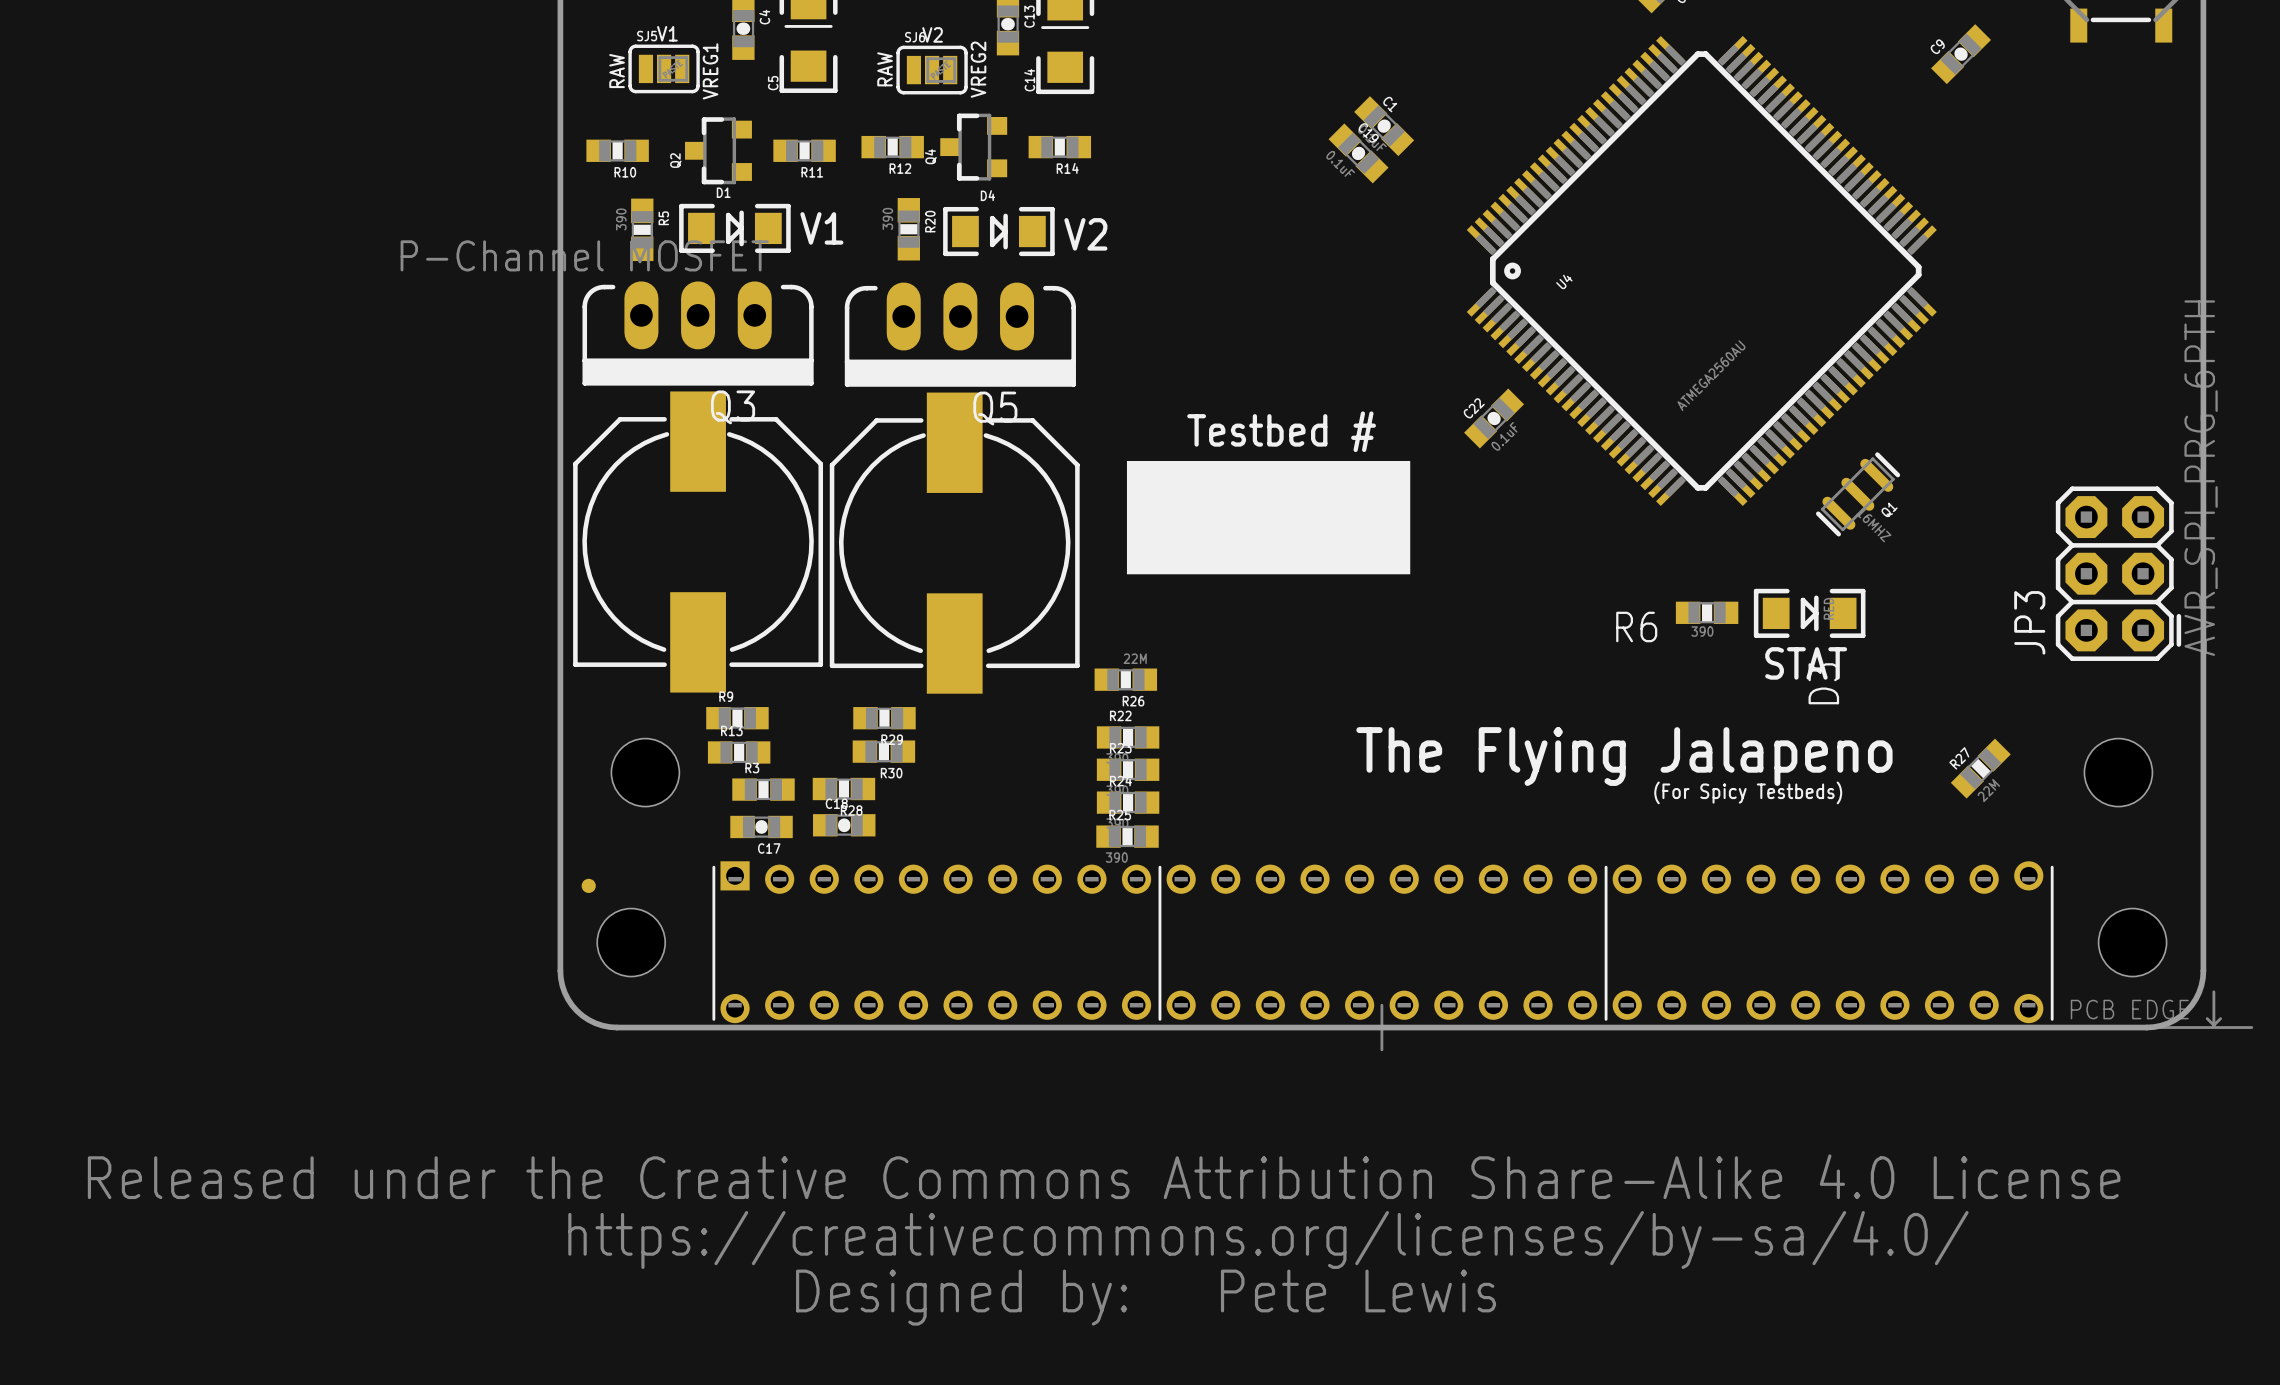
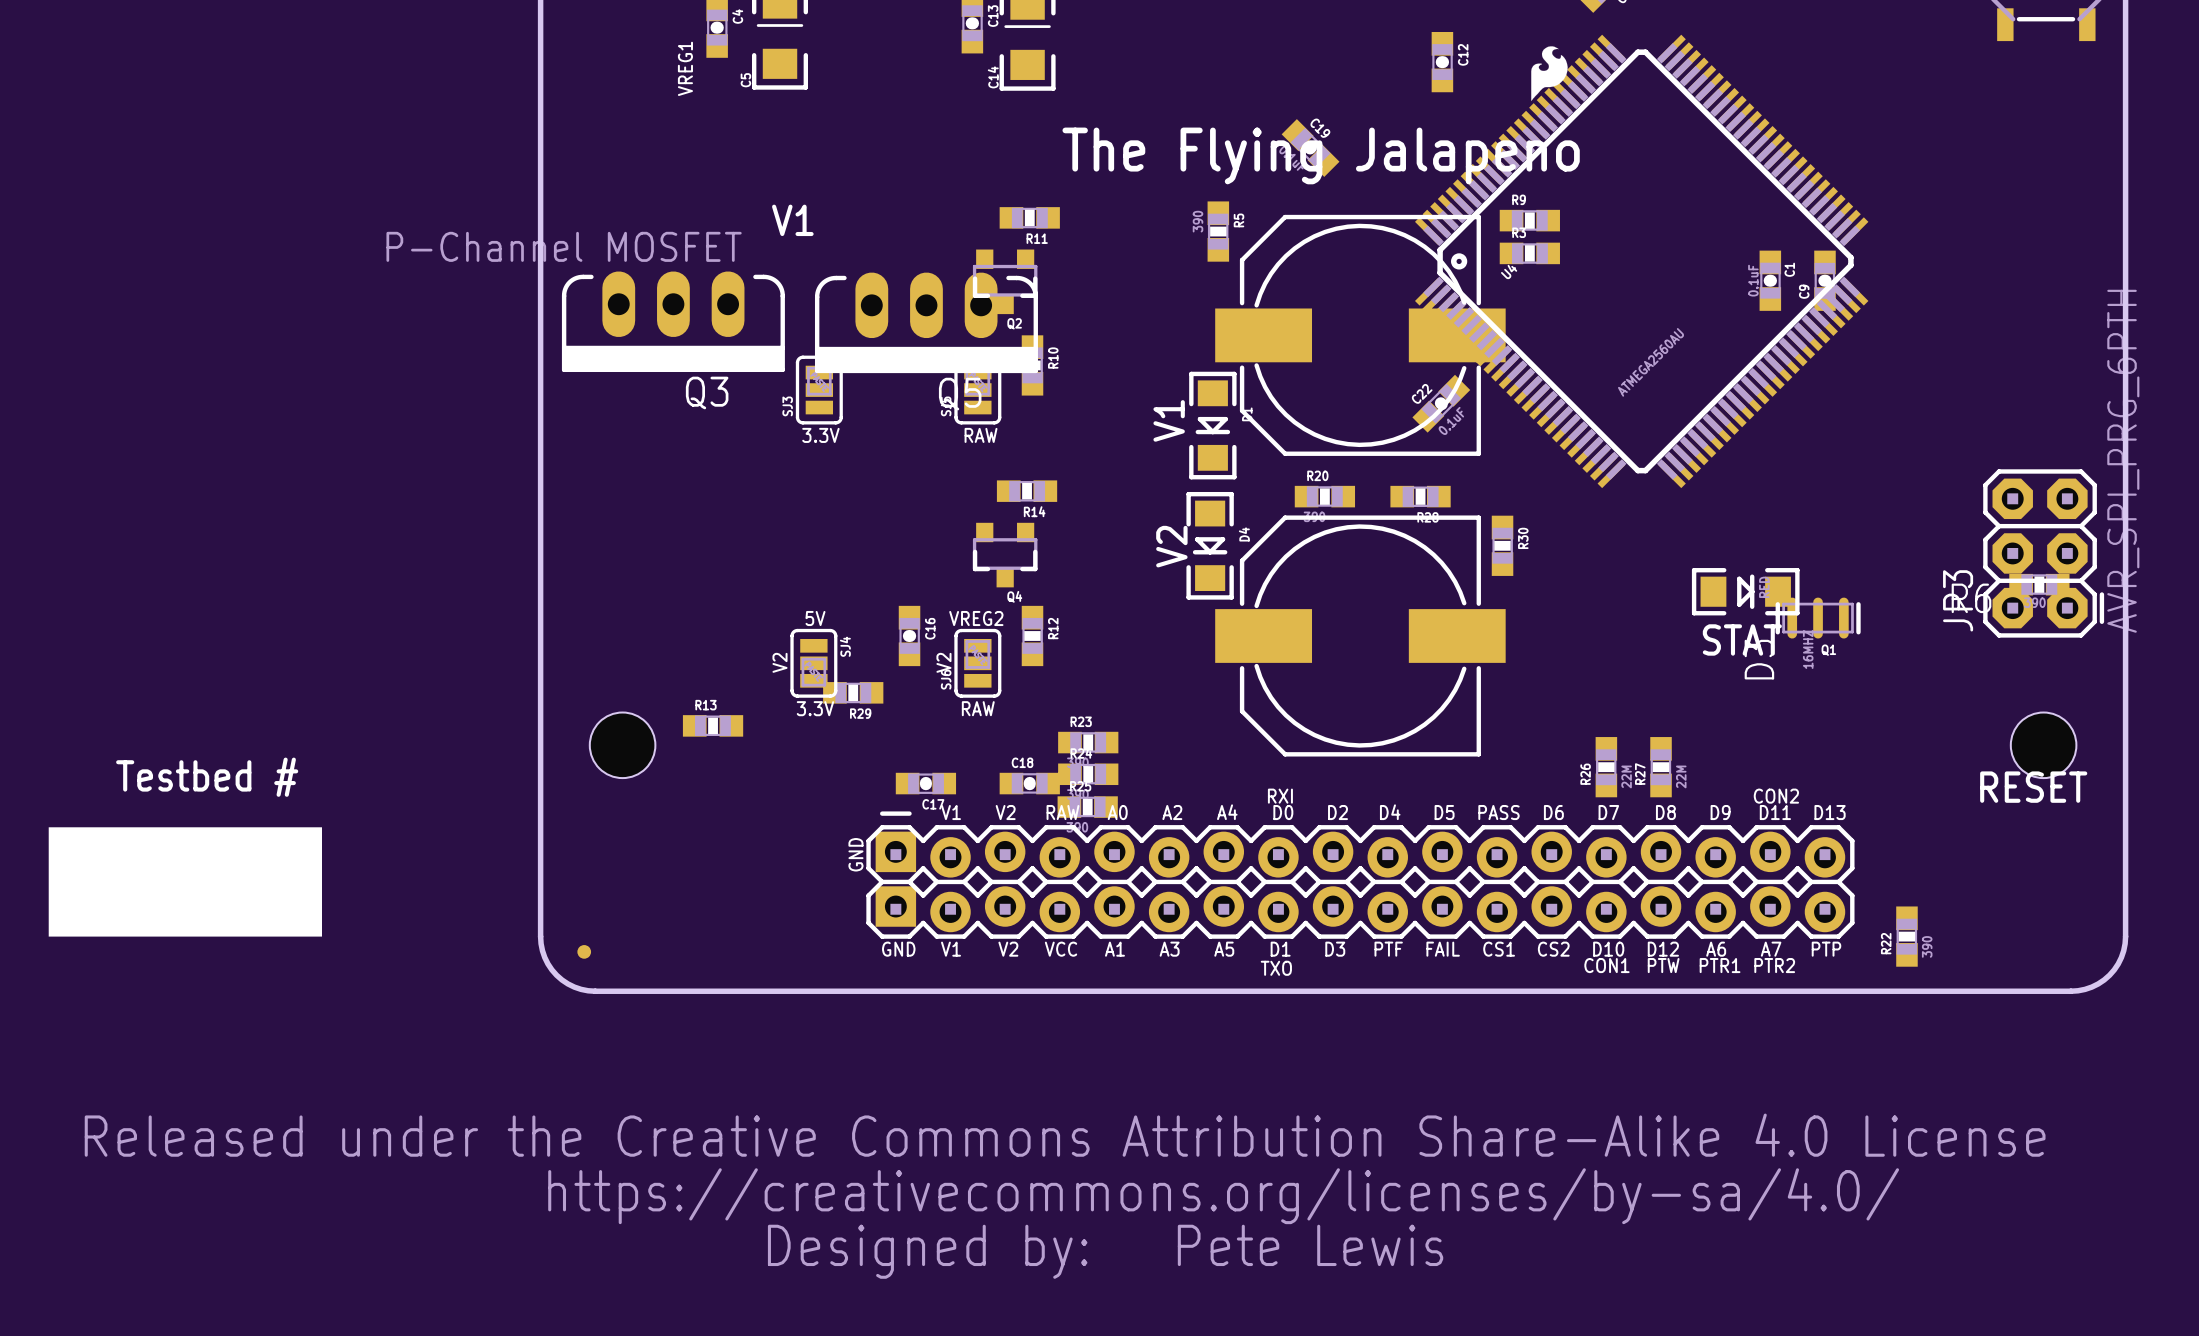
text: V1 (667, 33) -> none
text: V2 (932, 34) -> none
drawing: none -> [1531, 46, 1568, 102]
C9 rotation: 0° (1961, 54) -> 45° counterclockwise (1824, 280)
C9 position: (1961, 54) -> (1824, 280)
C12: none -> (1442, 62)
SJ5 rotation: 0° (664, 68) -> 90° counterclockwise (977, 390)
SJ5 position: (664, 68) -> (977, 390)
text: RAW (885, 69) -> none
text: VREG2 (978, 69) -> none
SJ6 rotation: 0° (932, 70) -> 90° counterclockwise (977, 663)
SJ6 position: (932, 70) -> (977, 663)
text: RAW (617, 71) -> none
C1 rotation: 0° (1384, 126) -> 45° clockwise (1770, 280)
C1 position: (1384, 126) -> (1770, 280)
R12 rotation: 0° (892, 147) -> 90° clockwise (1032, 635)
R12 position: (892, 147) -> (1032, 635)
Q4 rotation: 0° (973, 147) -> 90° counterclockwise (1005, 555)
Q4 position: (973, 147) -> (1005, 555)
R14 position: (1059, 147) -> (1027, 491)
R10 rotation: 0° (617, 150) -> 90° clockwise (1032, 365)
R10 position: (617, 150) -> (1032, 365)
Q2 rotation: 0° (718, 150) -> 90° counterclockwise (1005, 281)
Q2 position: (718, 150) -> (1005, 281)
R11 position: (804, 150) -> (1029, 217)
text: none -> The Flying Jalapeno (1321, 155)
D1 rotation: 0° (734, 228) -> 90° clockwise (1212, 425)
D1 position: (734, 228) -> (1212, 425)
R5 position: (642, 229) -> (1218, 231)
R20 rotation: 0° (908, 229) -> 90° clockwise (1324, 496)
R20 position: (908, 229) -> (1324, 496)
D4 rotation: 0° (998, 231) -> 90° clockwise (1210, 545)
D4 position: (998, 231) -> (1210, 545)
text: V2 (1085, 234) -> none
part: none -> (1360, 335)
SJ3: none -> (819, 390)
text: Testbed # (1281, 431) -> none
text: none -> V1 (1169, 420)
text: none -> 3.3V (820, 435)
text: none -> RAW (981, 435)
drawing: [1126, 460, 1411, 575] -> none
Q1 rotation: 0° (1858, 494) -> 45° clockwise (1818, 618)
Q1 position: (1858, 494) -> (1818, 618)
part: (698, 542) -> none
part: (954, 543) -> none
text: none -> V2 (1171, 546)
R6 position: (1707, 612) -> (2039, 584)
text: none -> 5V (815, 618)
text: none -> VREG2 (976, 618)
C16: none -> (909, 635)
part: none -> (1360, 635)
R26 rotation: 0° (1125, 679) -> 90° clockwise (1606, 767)
R26 position: (1125, 679) -> (1606, 767)
text: none -> V2 (780, 662)
SJ4: none -> (813, 663)
text: none -> V2 (943, 662)
R9 position: (737, 718) -> (1529, 220)
text: none -> 3.3V (815, 708)
text: none -> RAW (978, 708)
R22 rotation: 0° (1128, 737) -> 90° clockwise (1906, 936)
R22 position: (1128, 737) -> (1906, 936)
R30 rotation: 0° (883, 751) -> 90° clockwise (1502, 545)
R30 position: (883, 751) -> (1502, 545)
text: The Flying Jalapeno (1624, 756) -> none
R27 rotation: 0° (1980, 768) -> 45° counterclockwise (1661, 767)
R27 position: (1980, 768) -> (1661, 767)
R3 position: (763, 789) -> (1529, 253)
R28 position: (843, 789) -> (1420, 496)
text: (For Spicy Testbeds) (1748, 792) -> none
text: none -> Testbed # (207, 777)
text: none -> RESET (2033, 787)
C18 position: (844, 825) -> (1029, 783)
C17 position: (761, 826) -> (925, 783)
drawing: none -> [48, 827, 322, 937]
part position: (588, 885) -> (584, 951)
part: none -> (1360, 875)
part: (1425, 956) -> none

